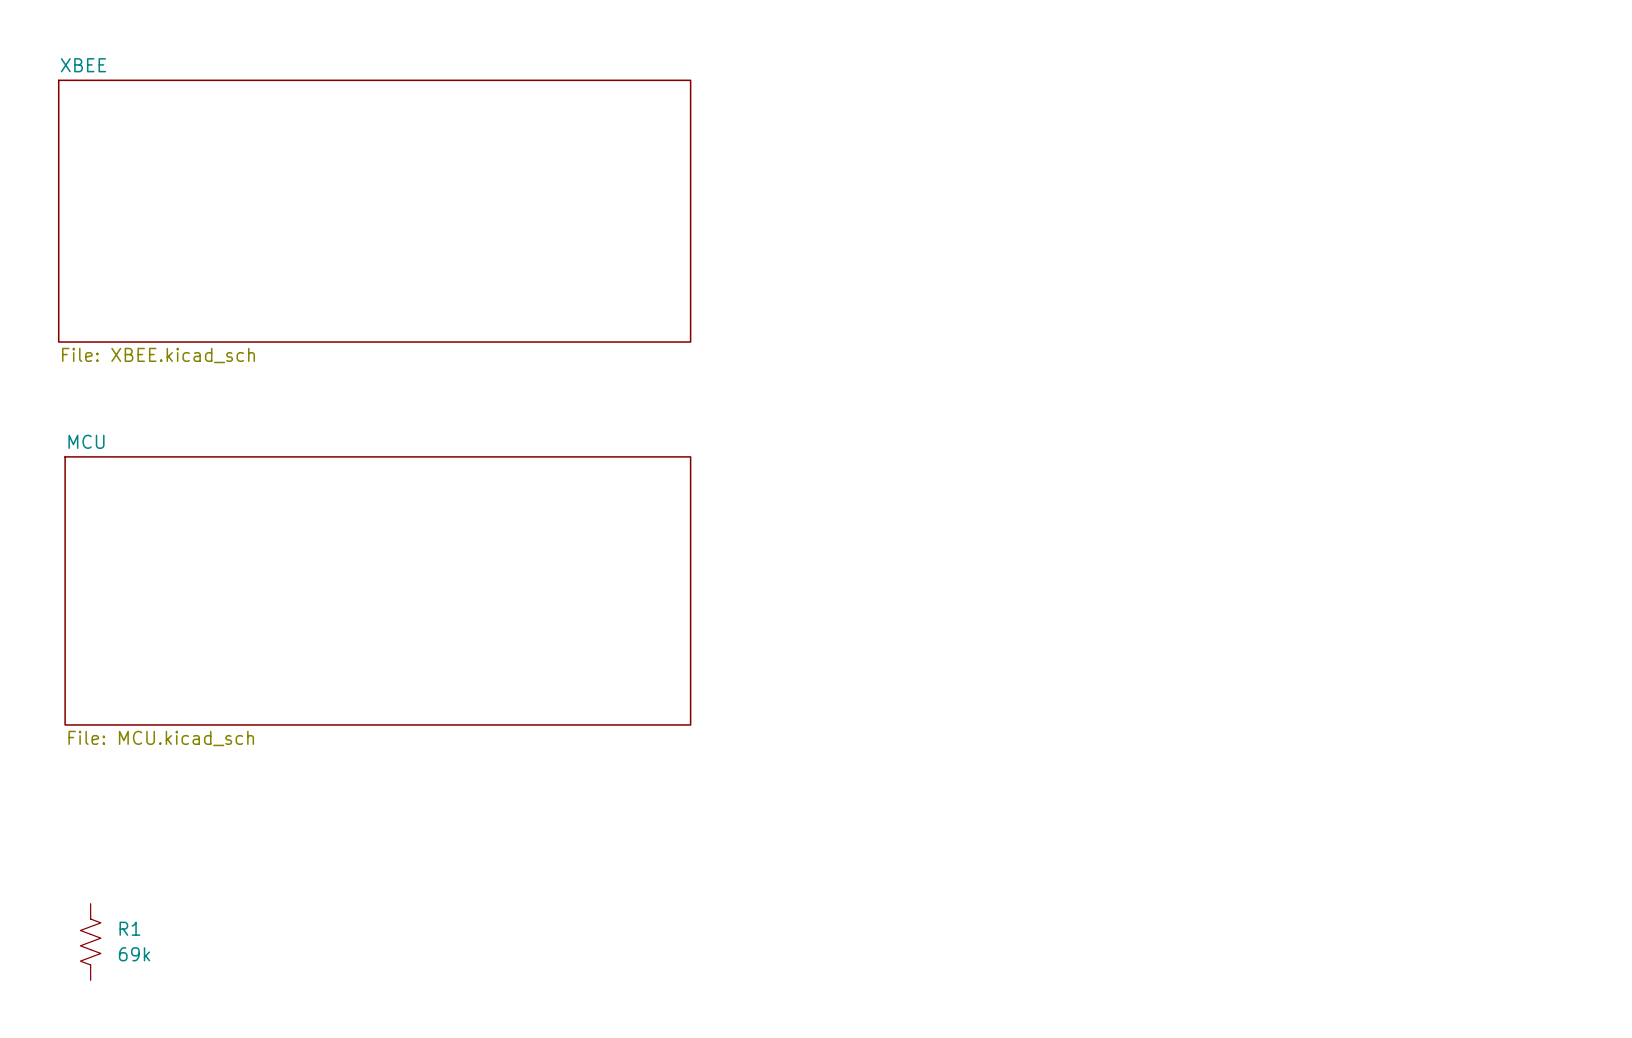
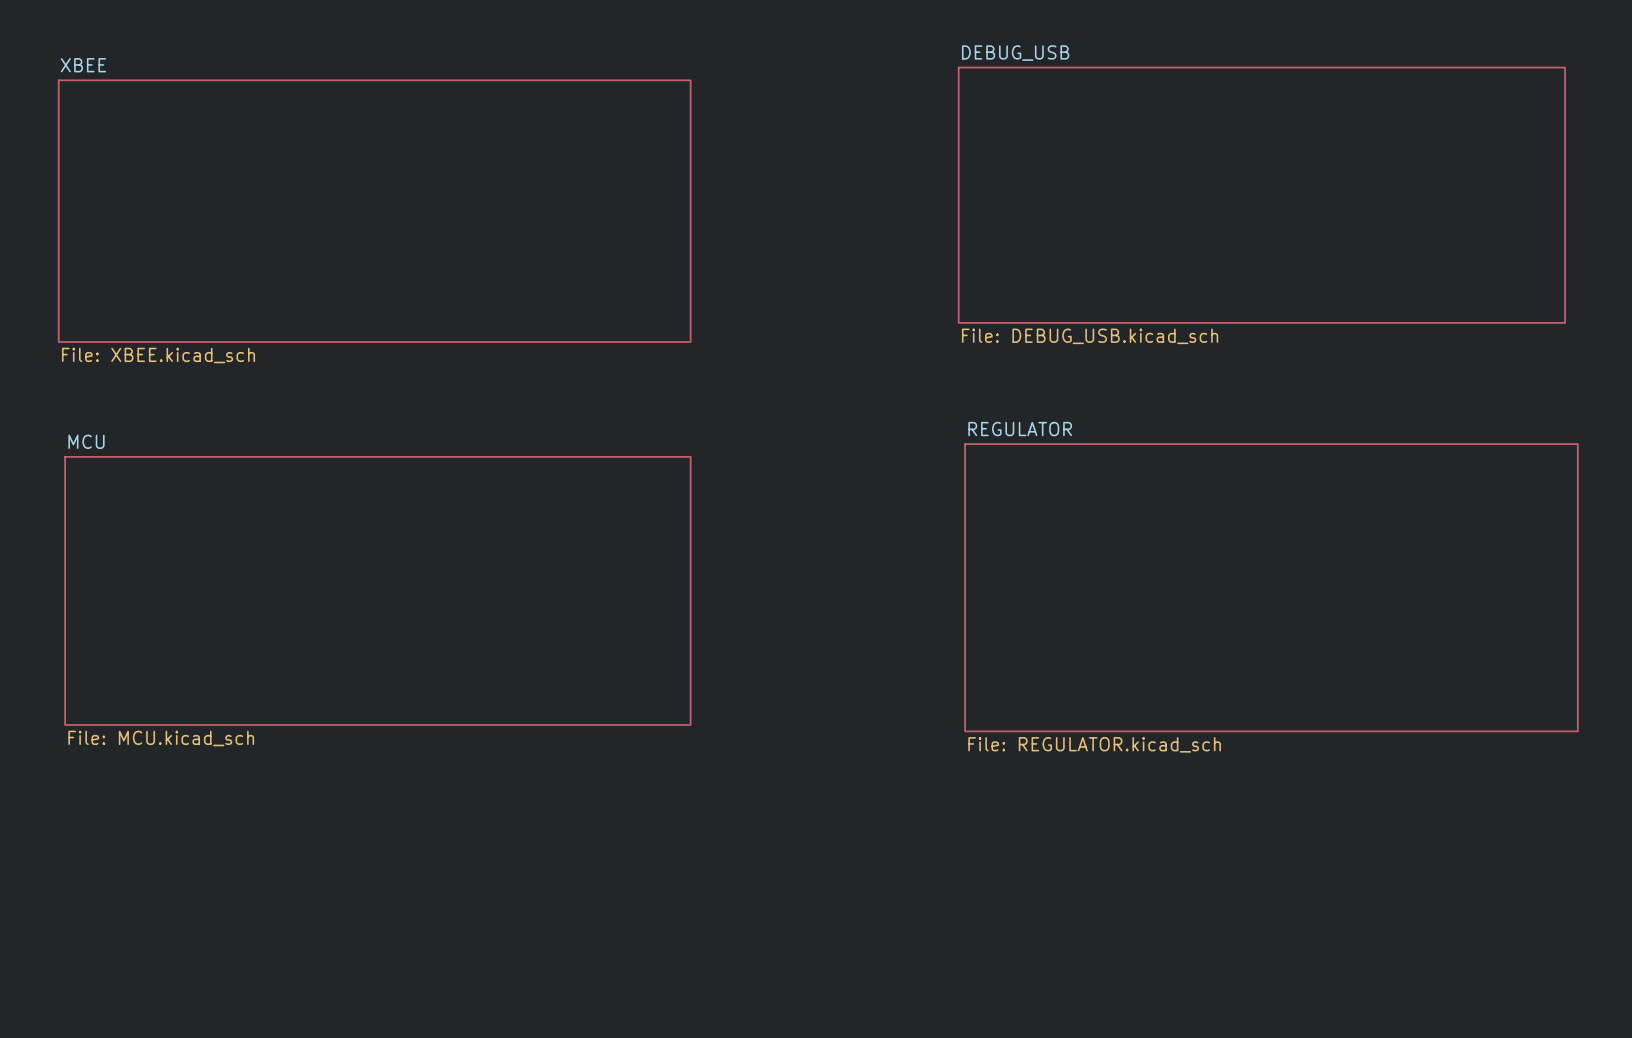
sheet DEBUG_USB: none -> File: DEBUG_USB.kicad_sch (1261, 195)
sheet REGULATOR: none -> File: REGULATOR.kicad_sch (1271, 587)
R1: 69k (90, 941) -> none

